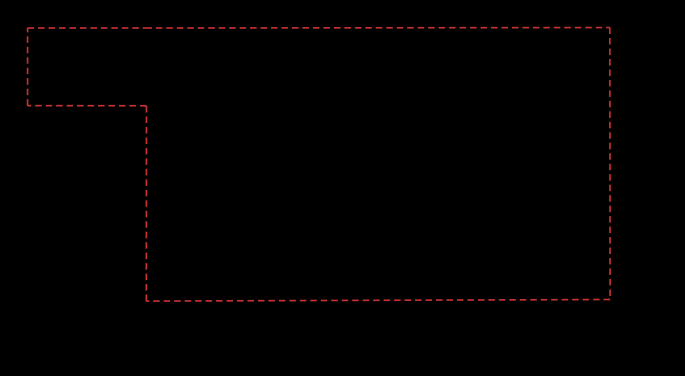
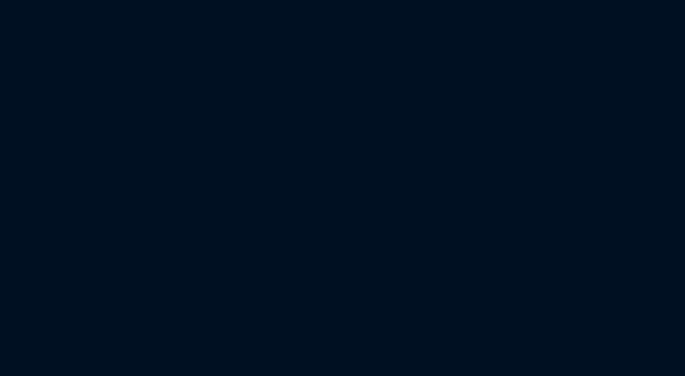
zone outline: (609, 27) (610, 299) (146, 301) (146, 105) (27, 105) (27, 28) (609, 27) -> none

